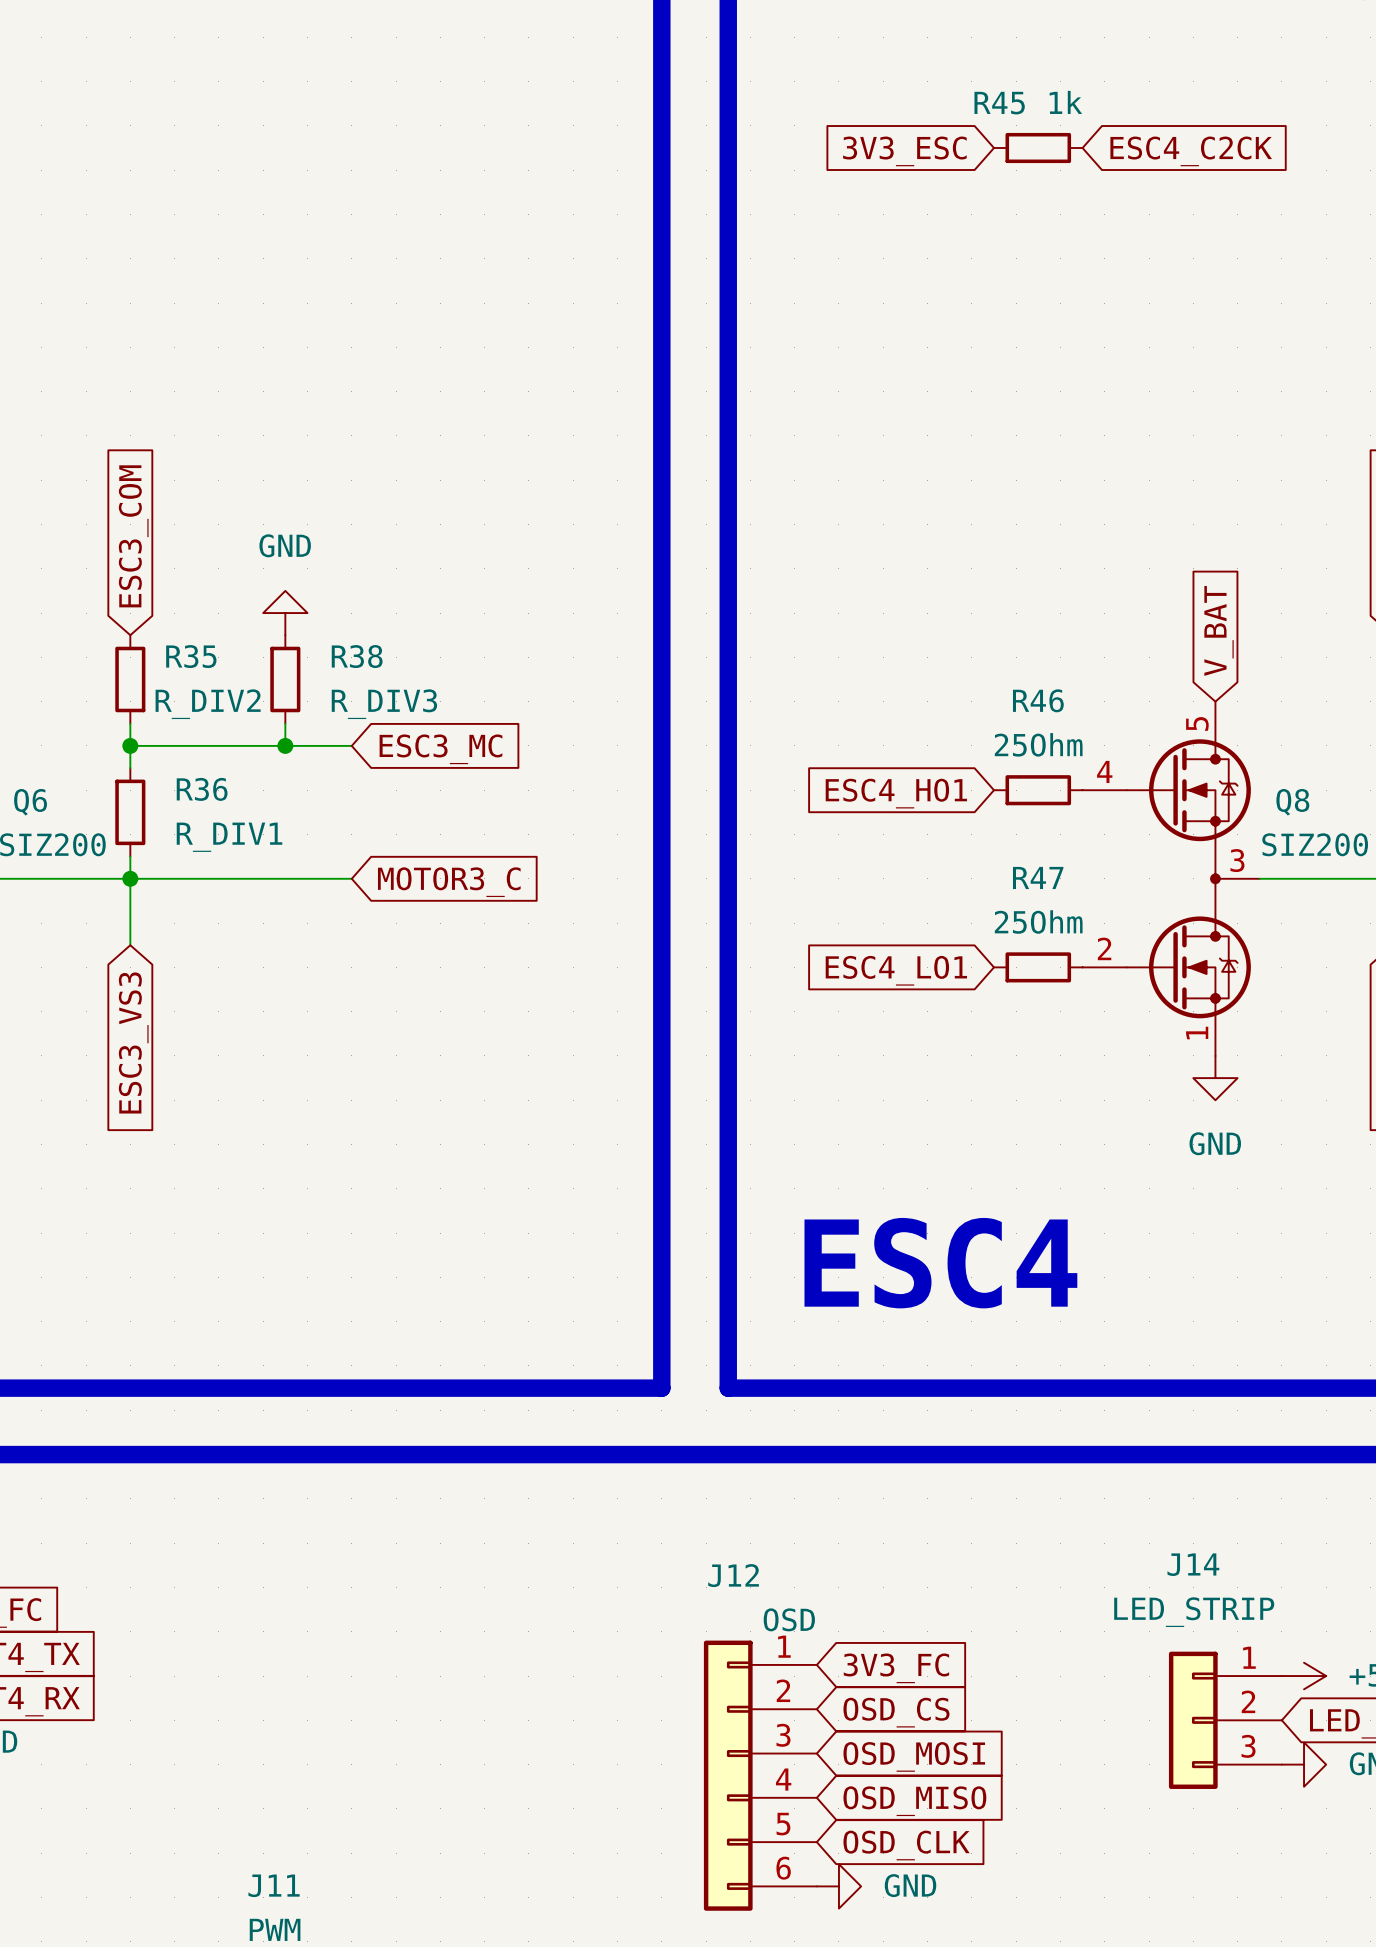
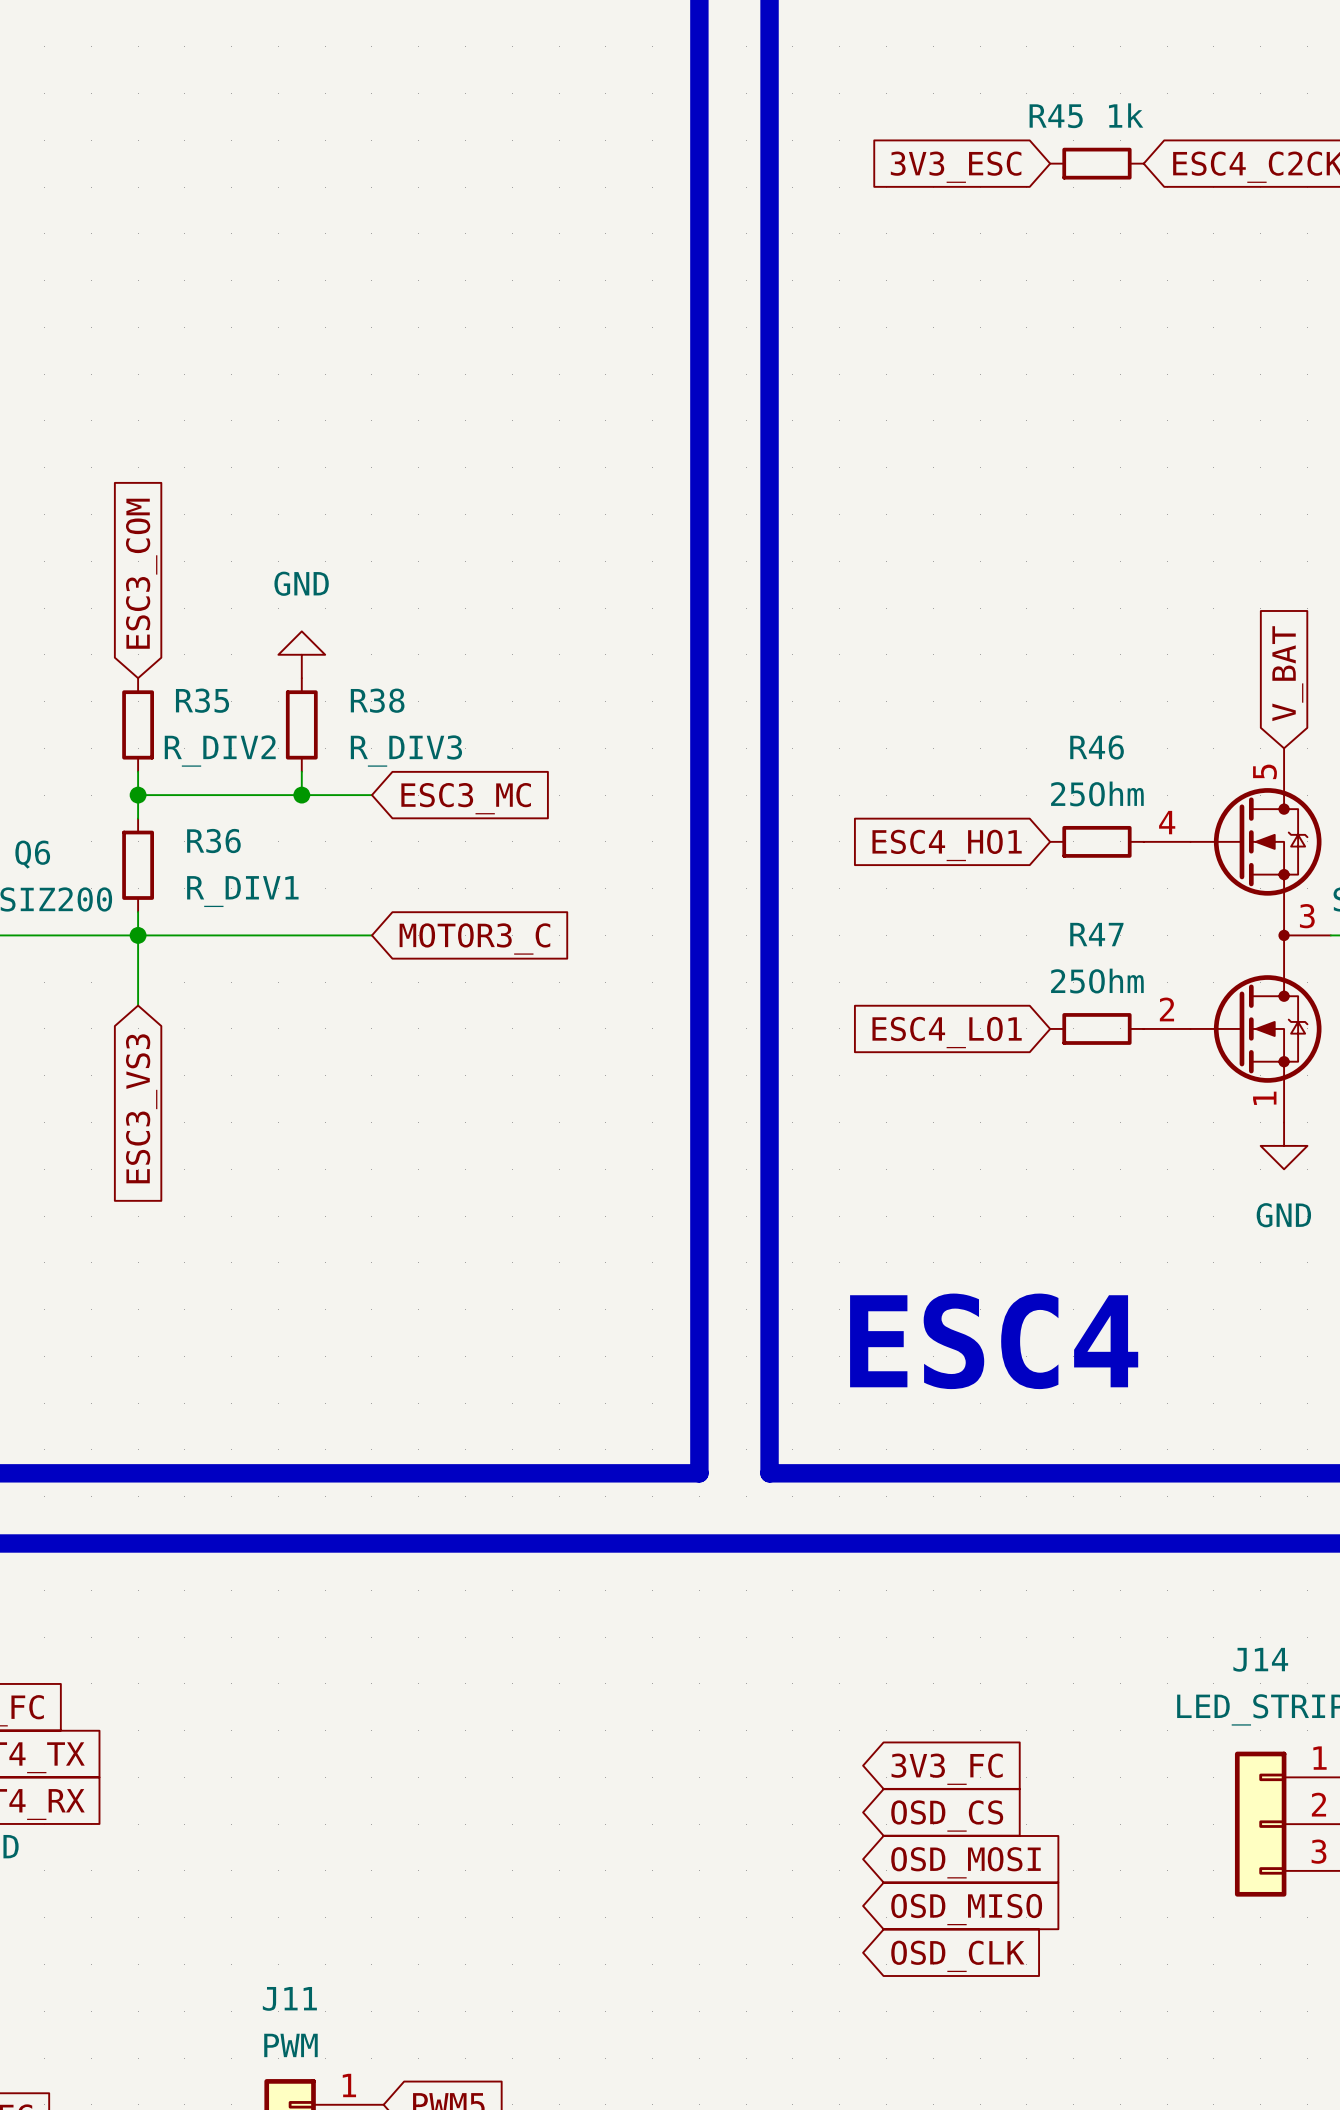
J12: OSD (760, 1775) -> none
power symbol: GND (838, 1886) -> none

